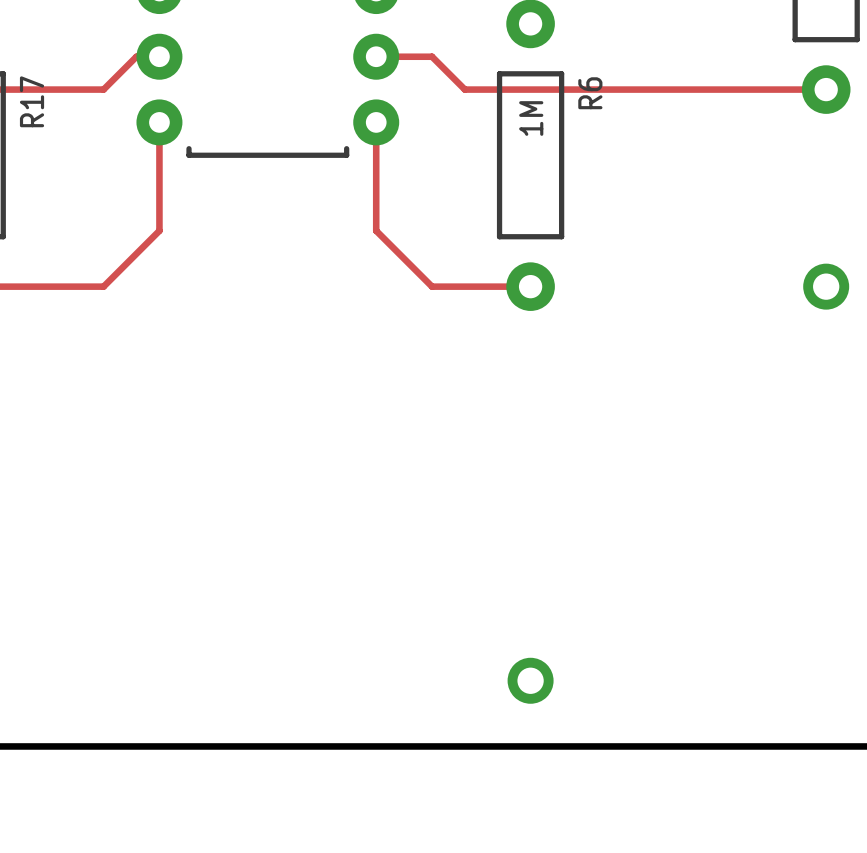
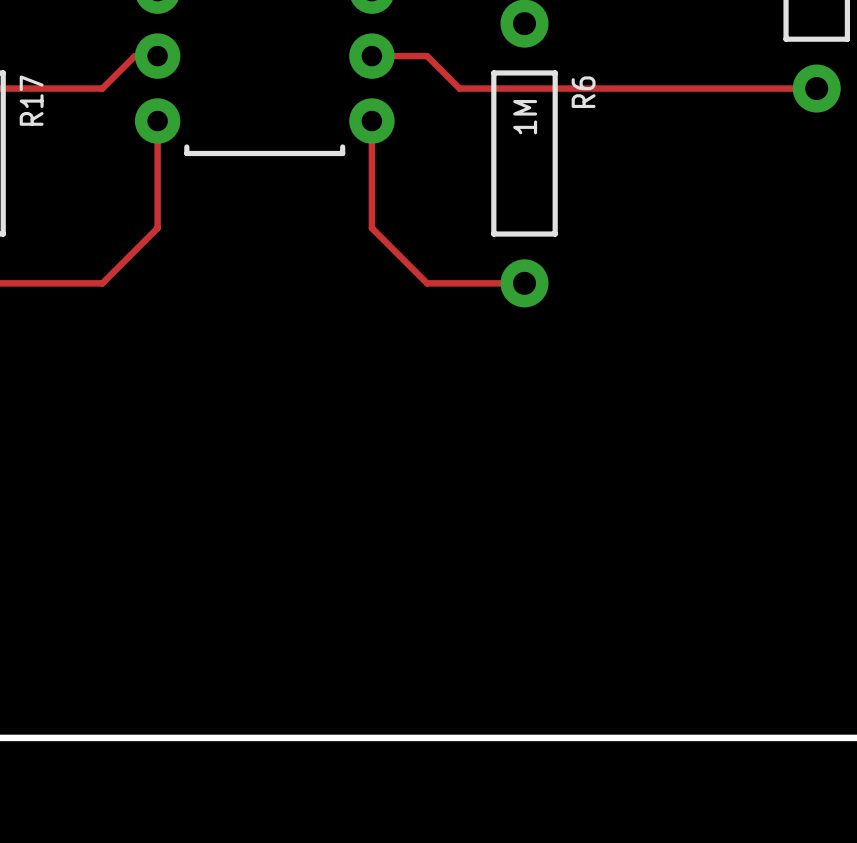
via: (826, 286) -> none
via: (530, 680) -> none

